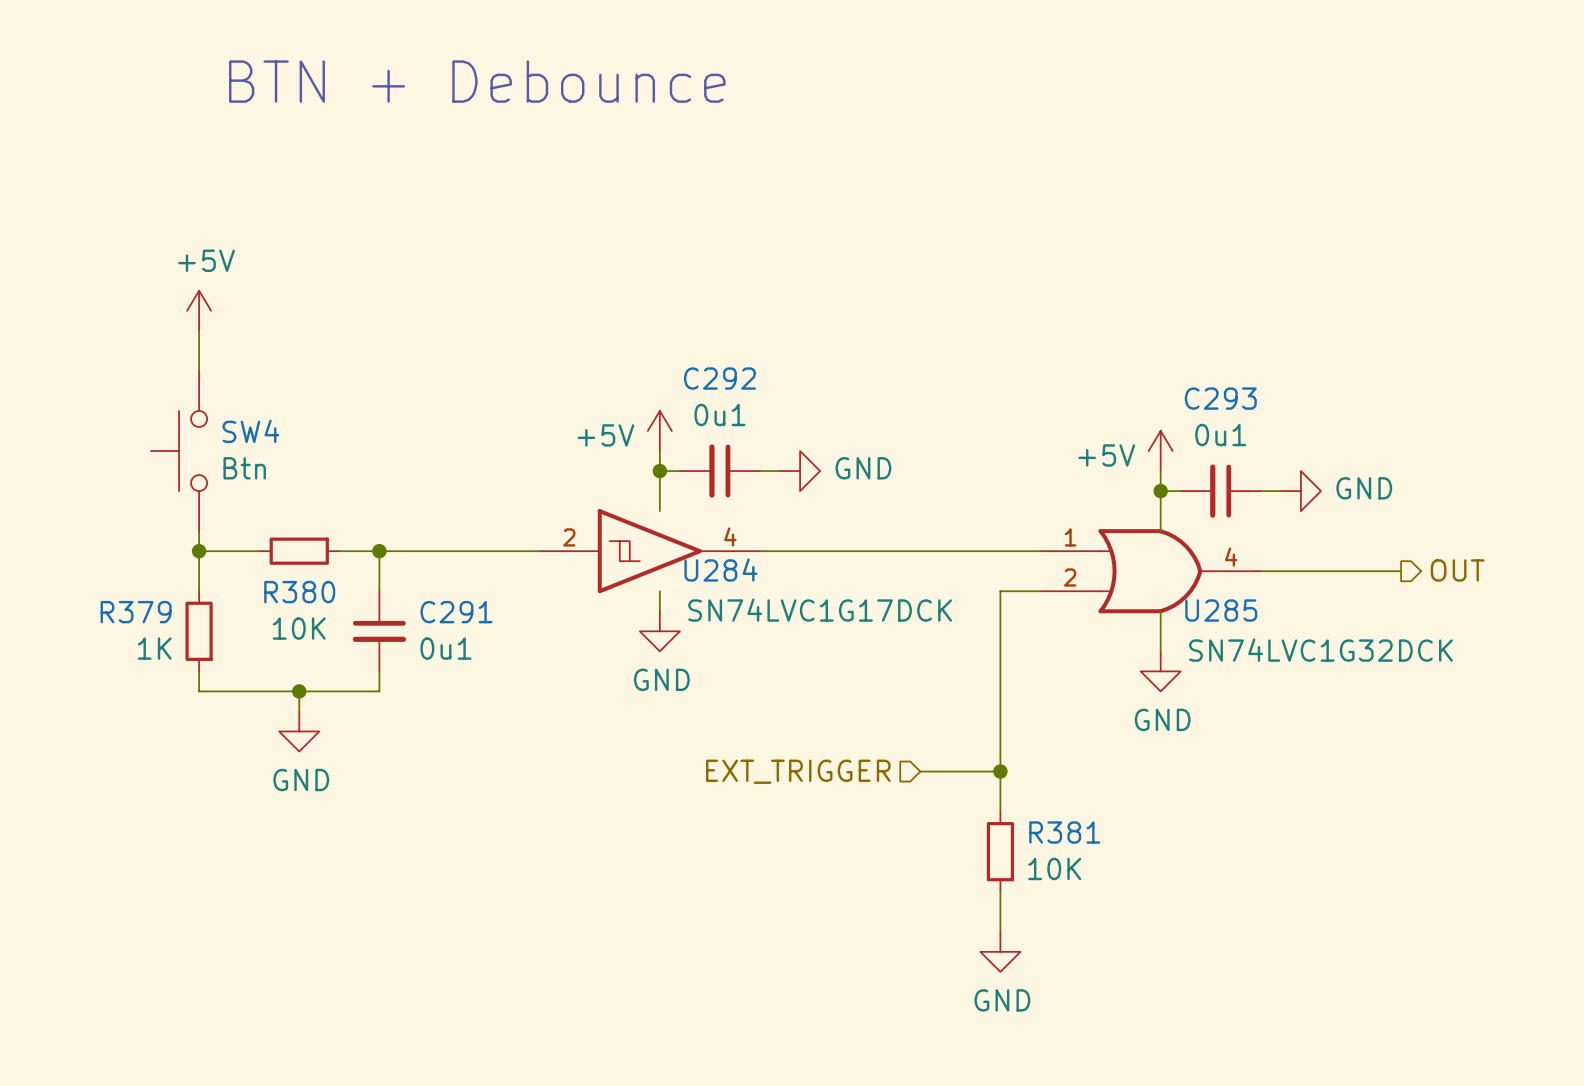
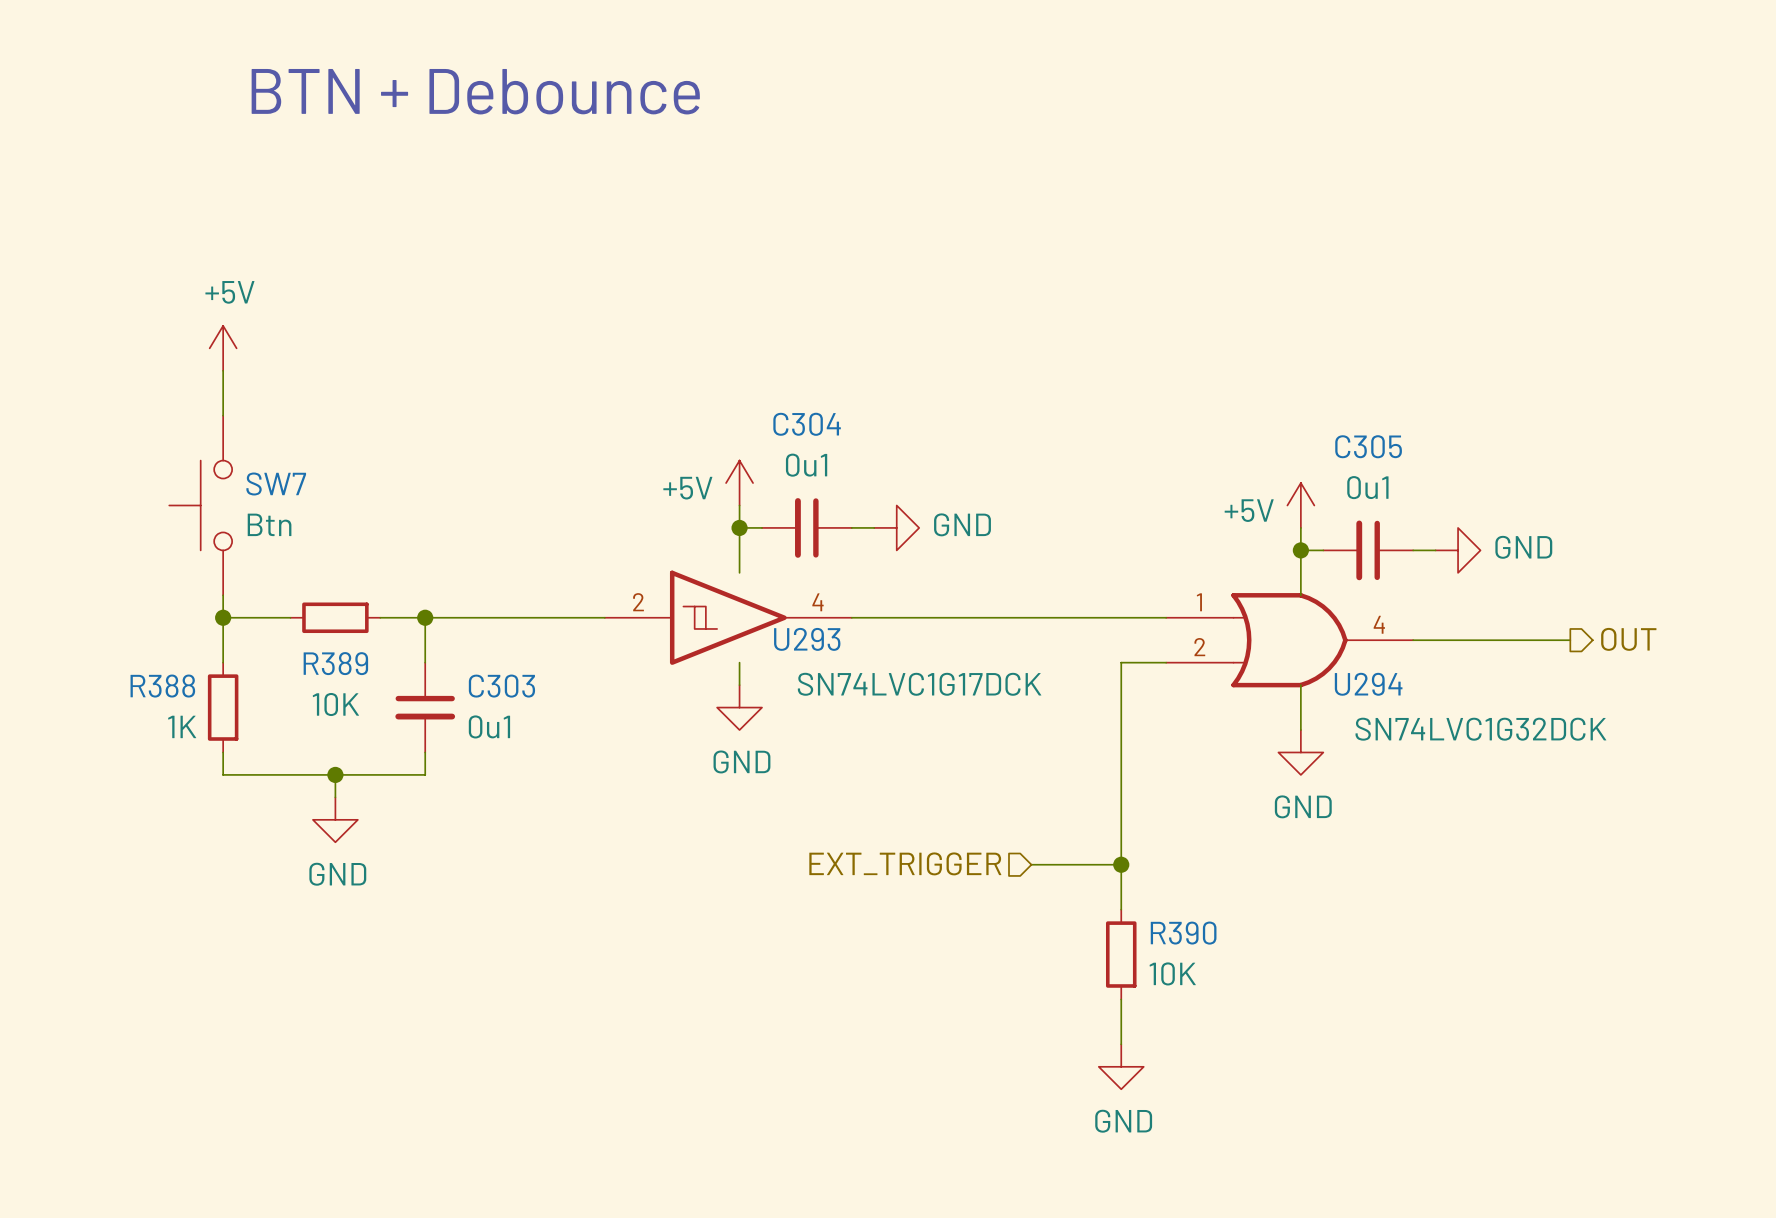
C292 name: C292 (719, 378) -> C304 (807, 424)
C293 name: C293 (1220, 398) -> C305 (1368, 446)
SW4 name: SW4 (250, 431) -> SW7 (276, 483)
U284 name: U284 (720, 569) -> U293 (807, 639)
R380 name: R380 (299, 592) -> R389 (335, 663)
U285 name: U285 (1221, 610) -> U294 (1368, 684)
R379 name: R379 (136, 612) -> R388 (162, 686)
C291 name: C291 (456, 612) -> C303 (501, 686)
R381 name: R381 (1064, 832) -> R390 (1183, 933)

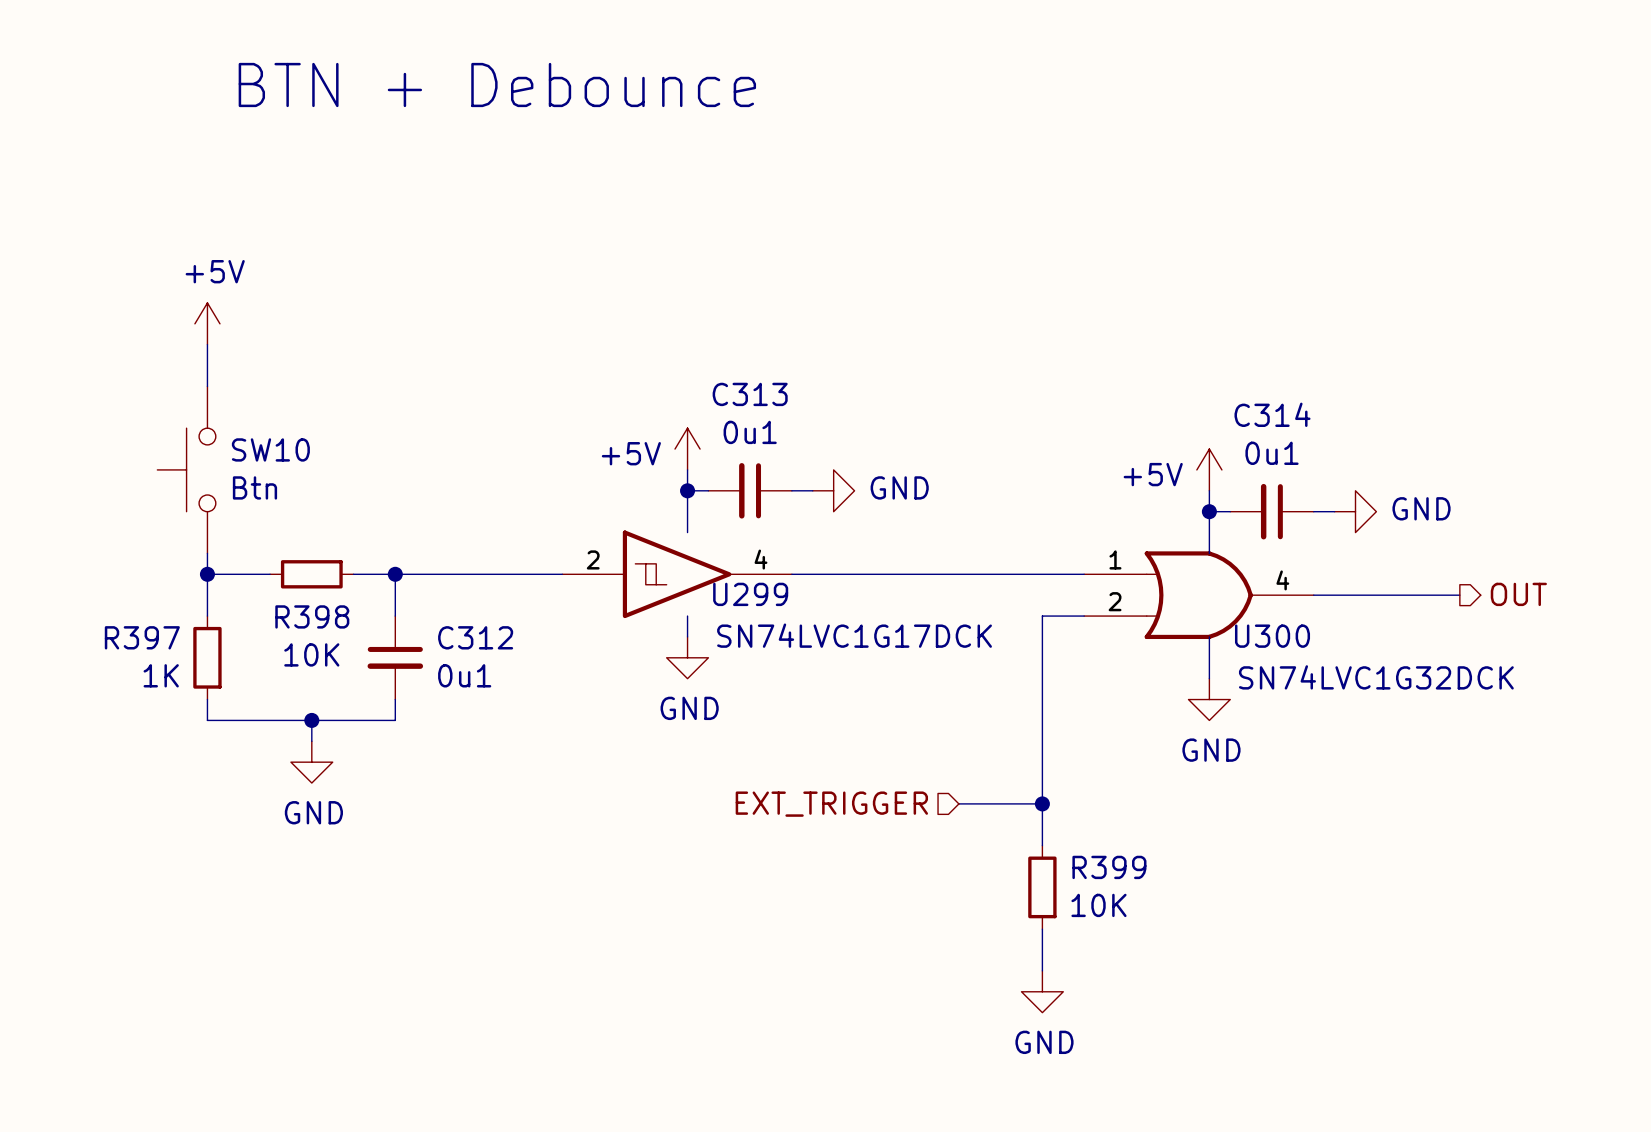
C304 name: C304 (807, 424) -> C313 (750, 394)
C305 name: C305 (1368, 446) -> C314 (1272, 414)
SW7 name: SW7 (276, 483) -> SW10 (270, 449)
U293 name: U293 (807, 639) -> U299 (750, 594)
R389 name: R389 (335, 663) -> R398 (312, 616)
U294 name: U294 (1368, 684) -> U300 (1272, 636)
R388 name: R388 (162, 686) -> R397 (142, 637)
C303 name: C303 (501, 686) -> C312 (475, 637)
R390 name: R390 (1183, 933) -> R399 (1109, 867)

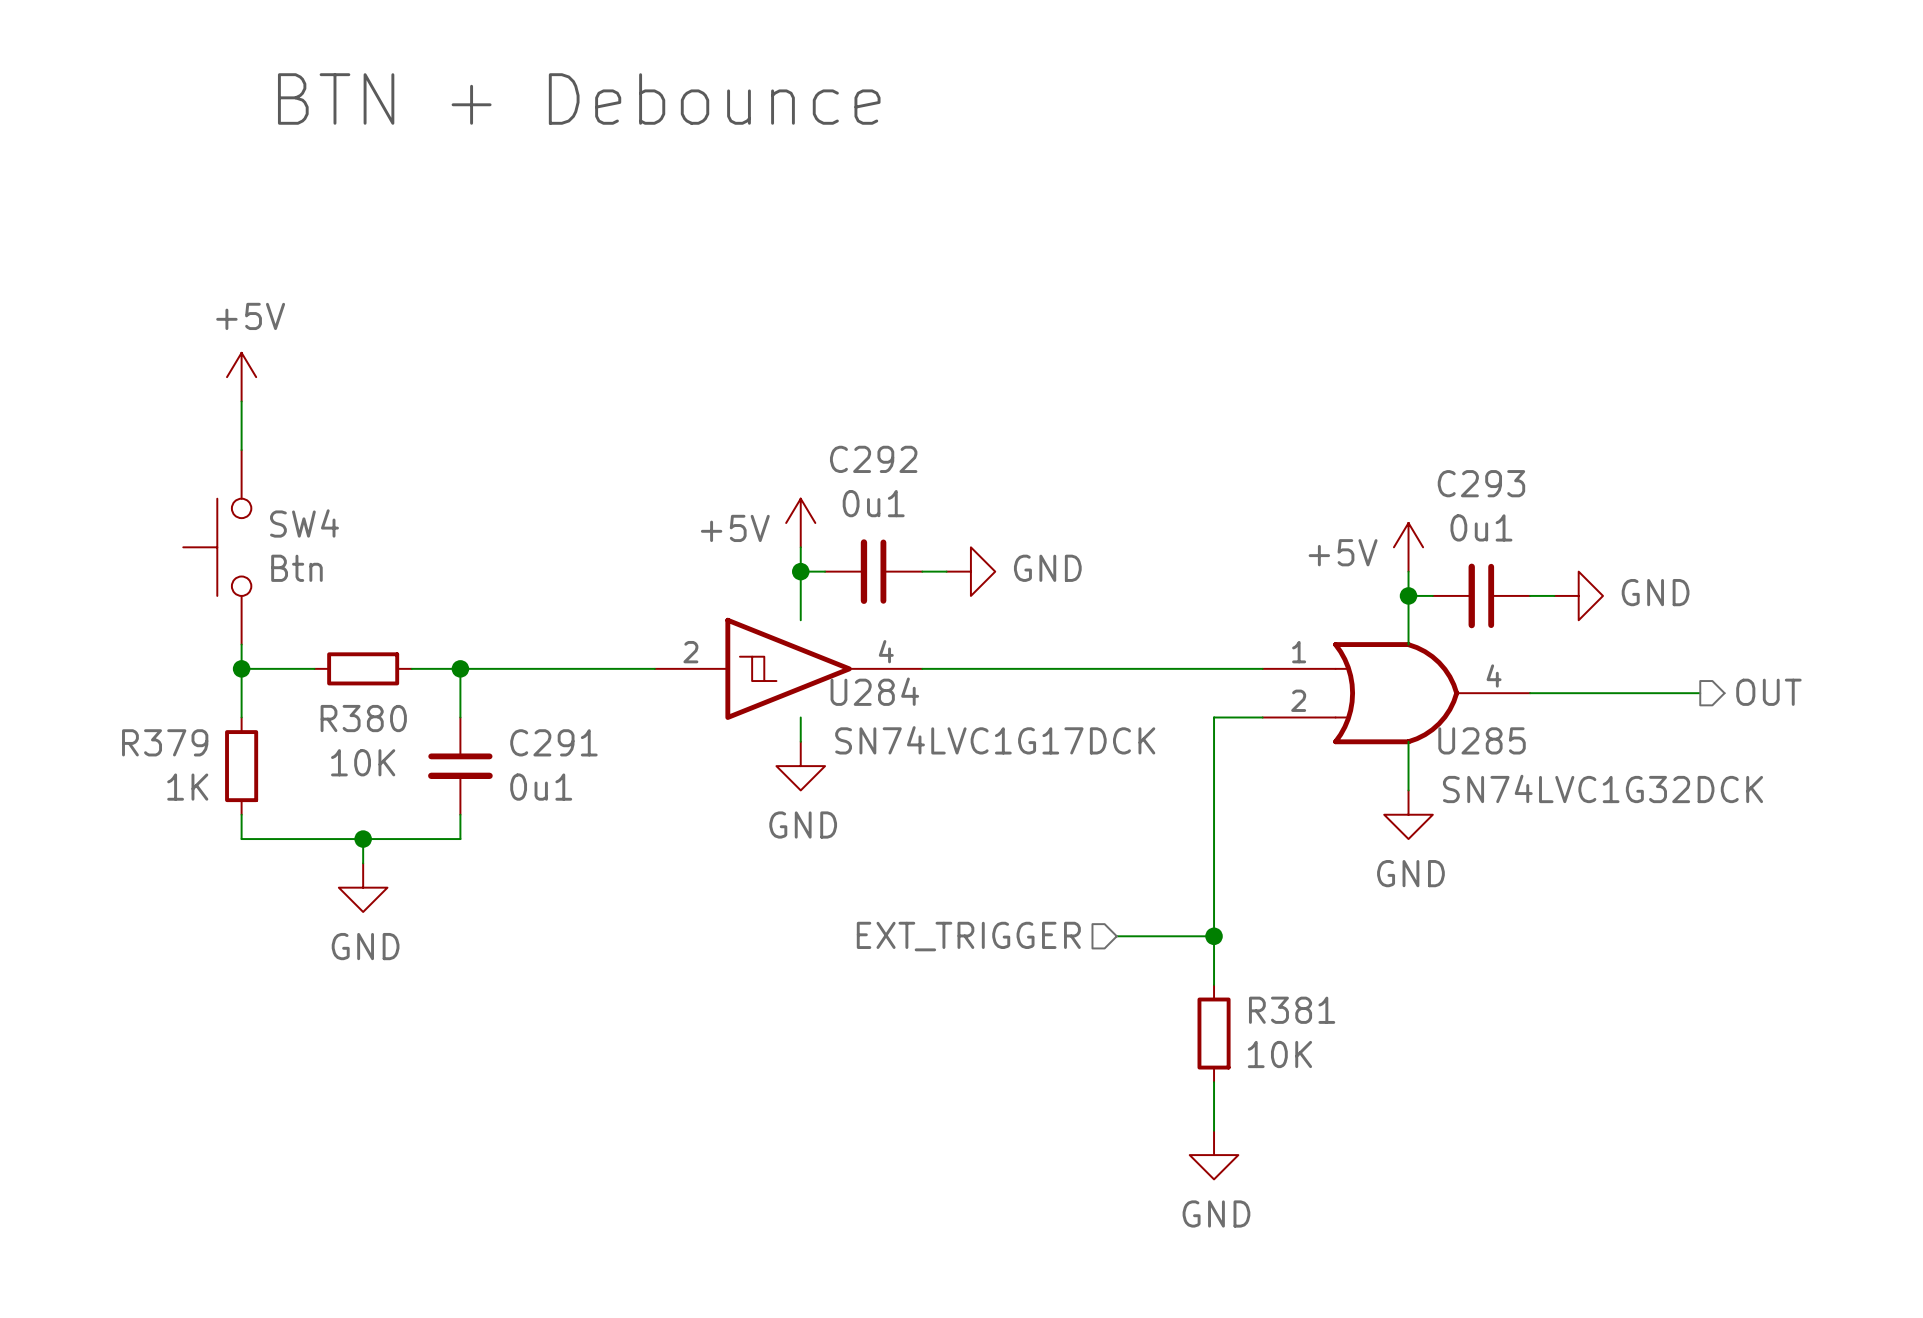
C313 name: C313 (750, 394) -> C292 (873, 459)
C314 name: C314 (1272, 414) -> C293 (1481, 483)
SW10 name: SW10 (270, 449) -> SW4 (304, 523)
U299 name: U299 (750, 594) -> U284 (874, 691)
R398 name: R398 (312, 616) -> R380 (363, 718)
U300 name: U300 (1272, 636) -> U285 (1482, 740)
R397 name: R397 (142, 637) -> R379 (165, 742)
C312 name: C312 (475, 637) -> C291 (553, 742)
R399 name: R399 (1109, 867) -> R381 (1292, 1010)

